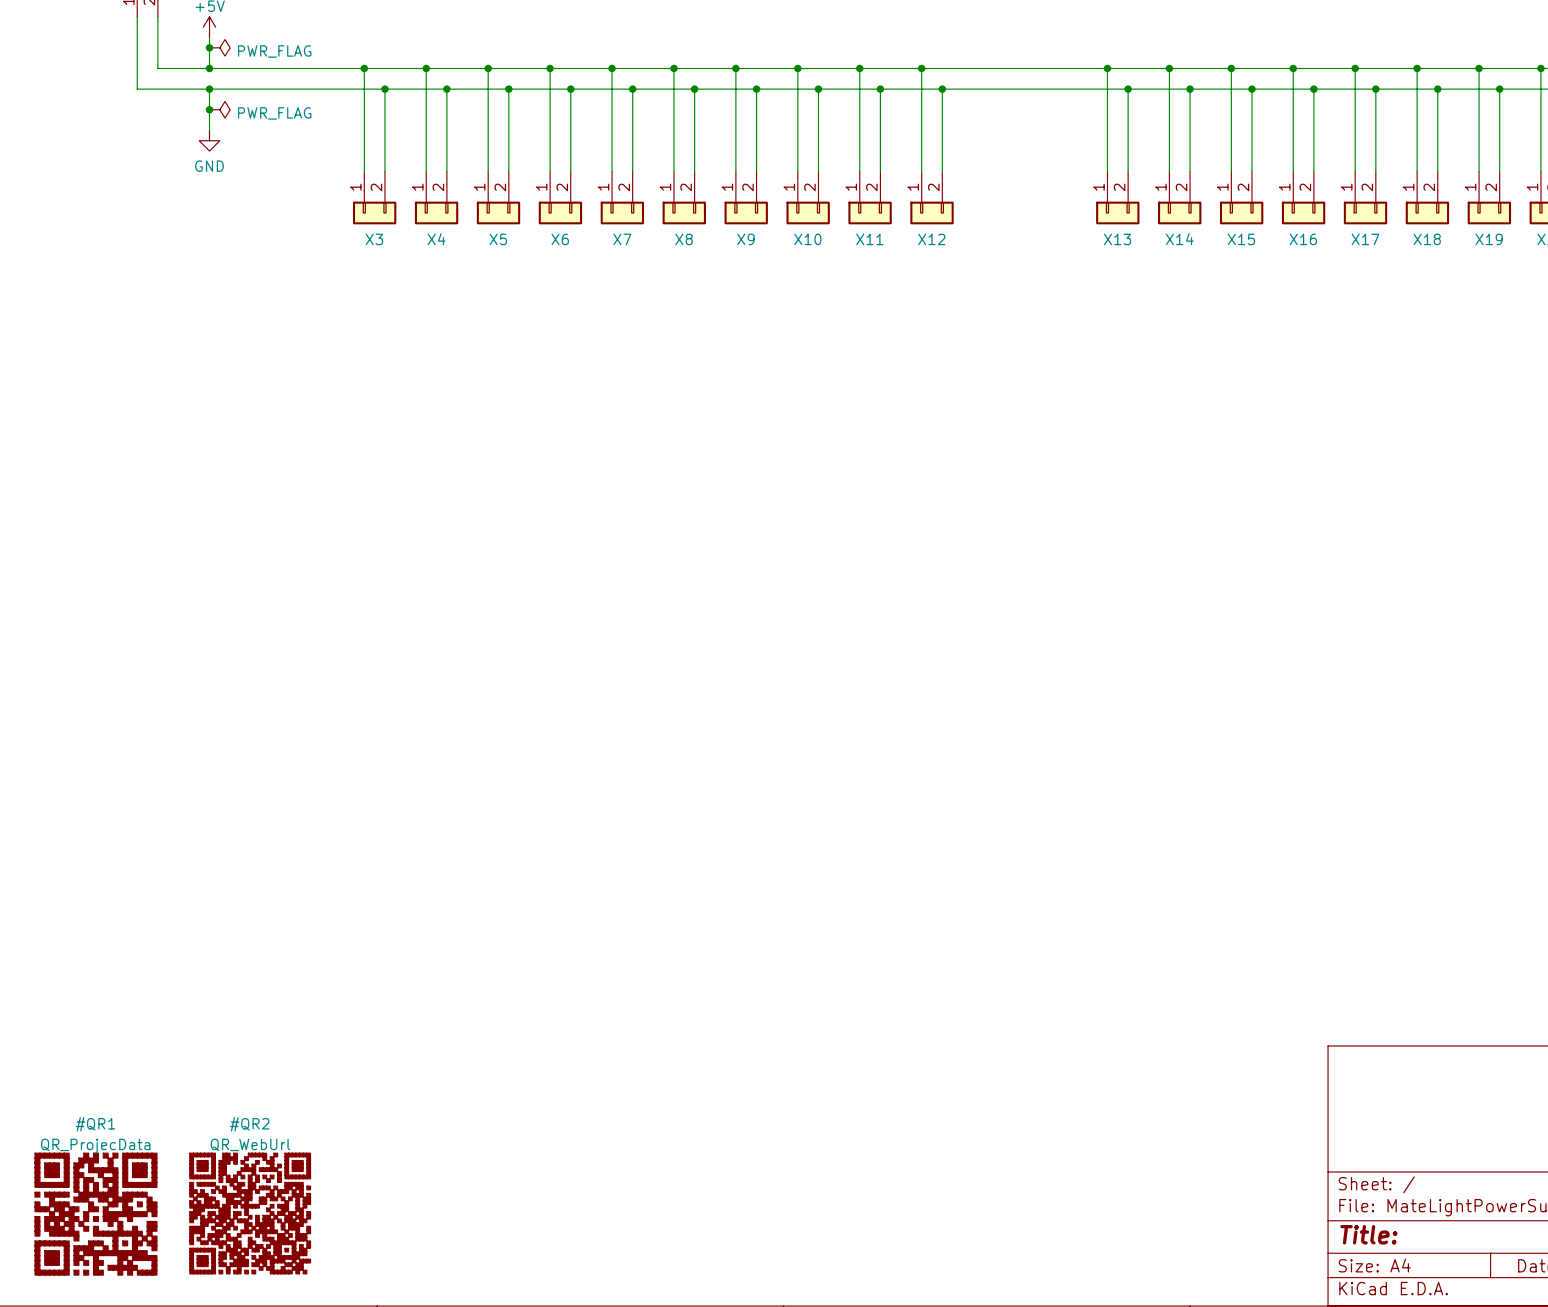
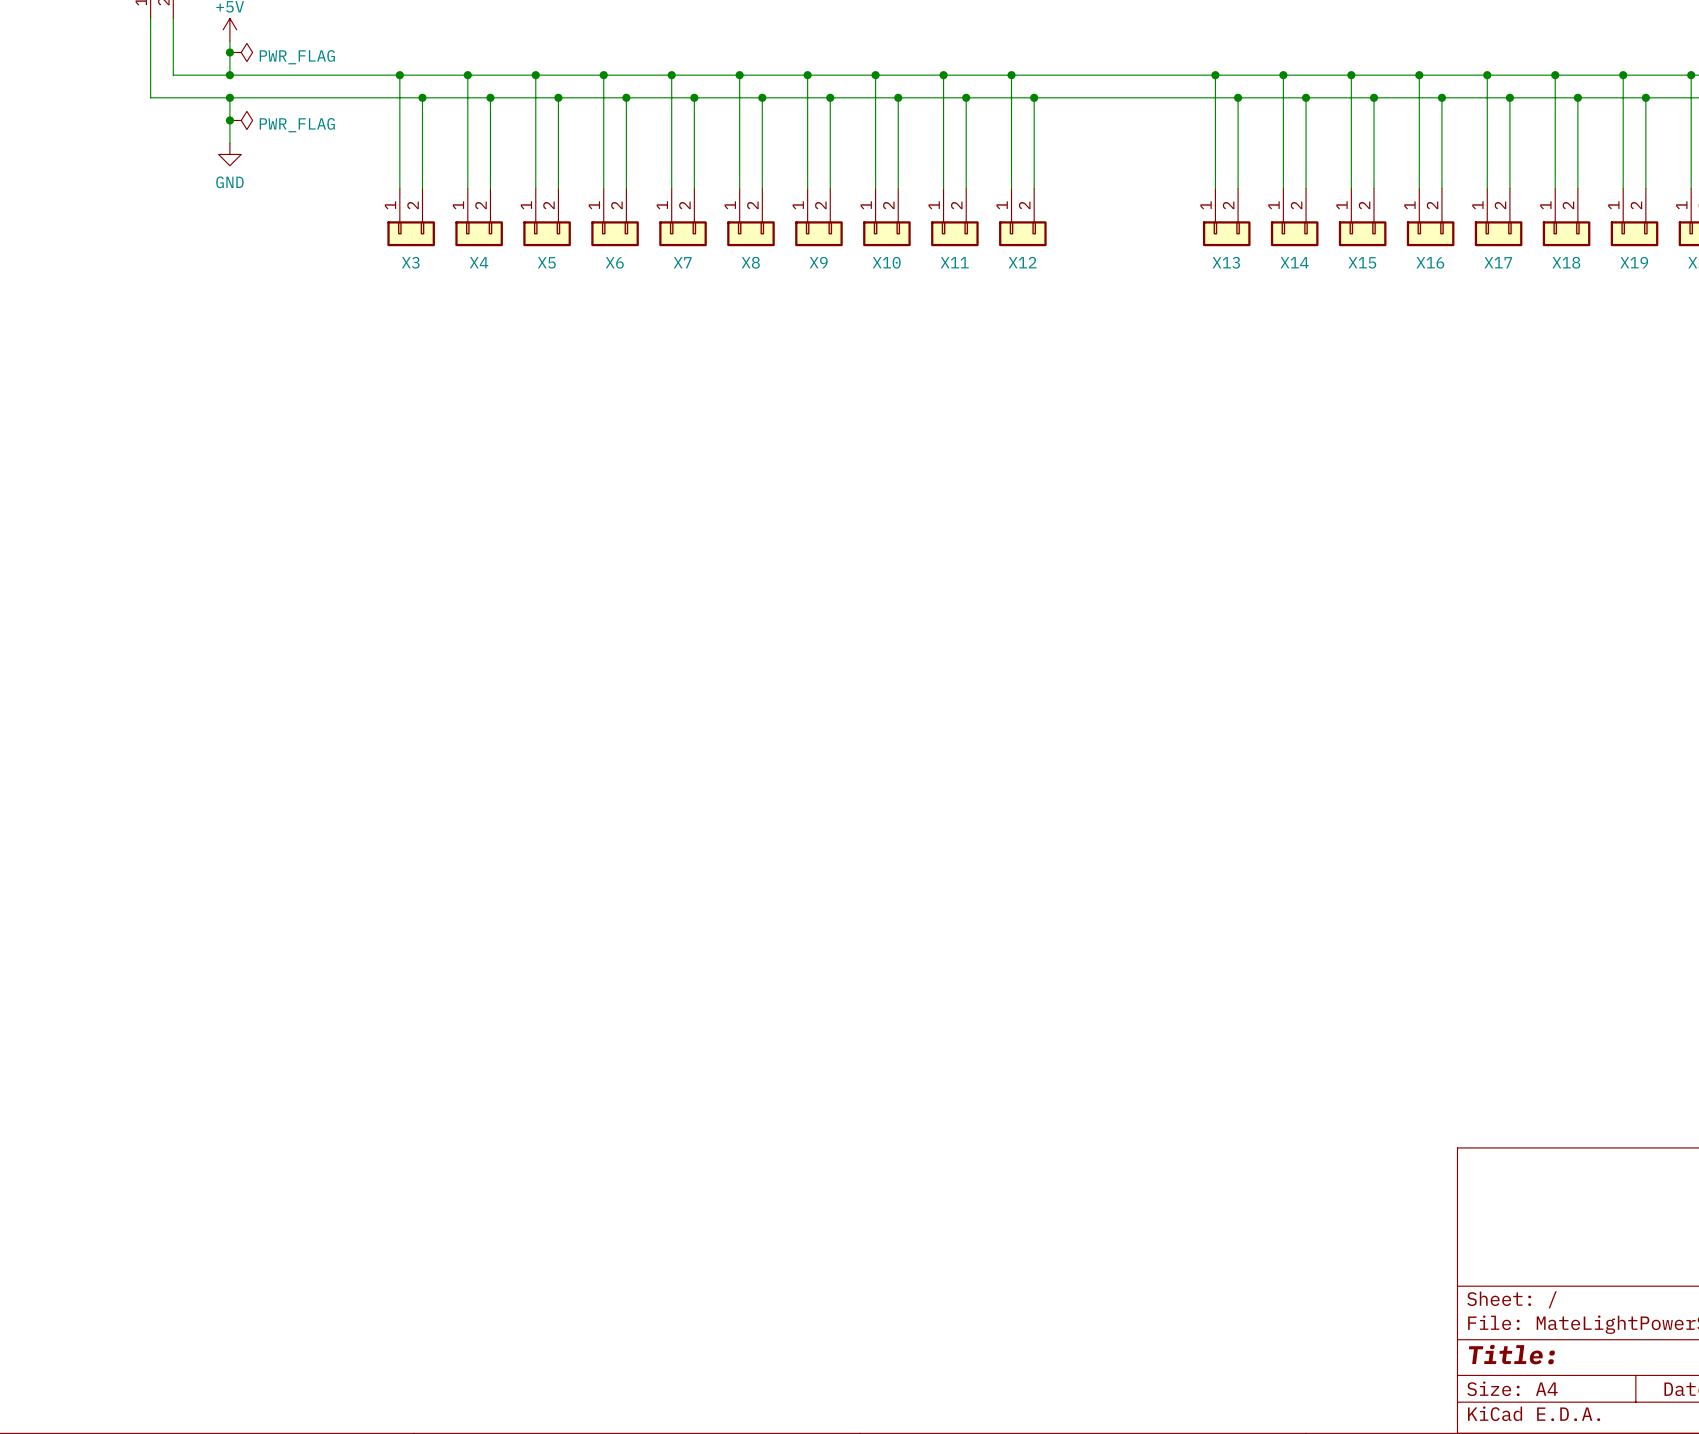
#QR2: QR_WebUrl (250, 1213) -> none
#QR1: QR_ProjecData (95, 1214) -> none

